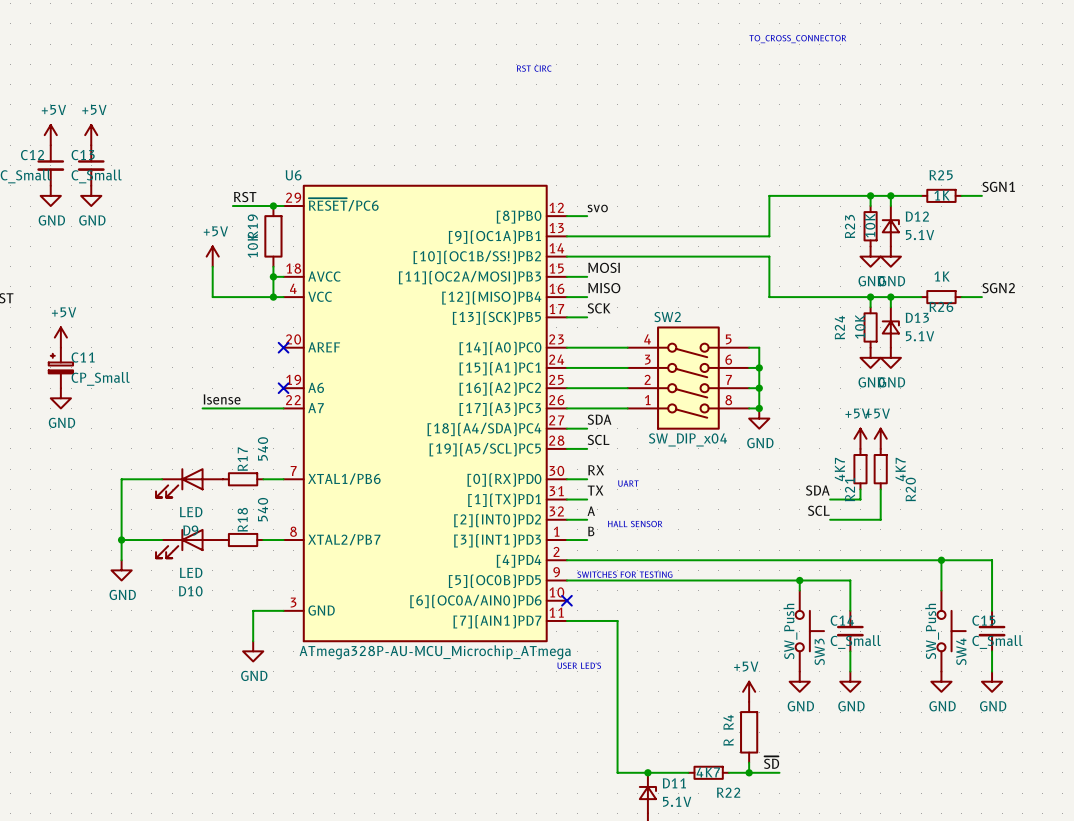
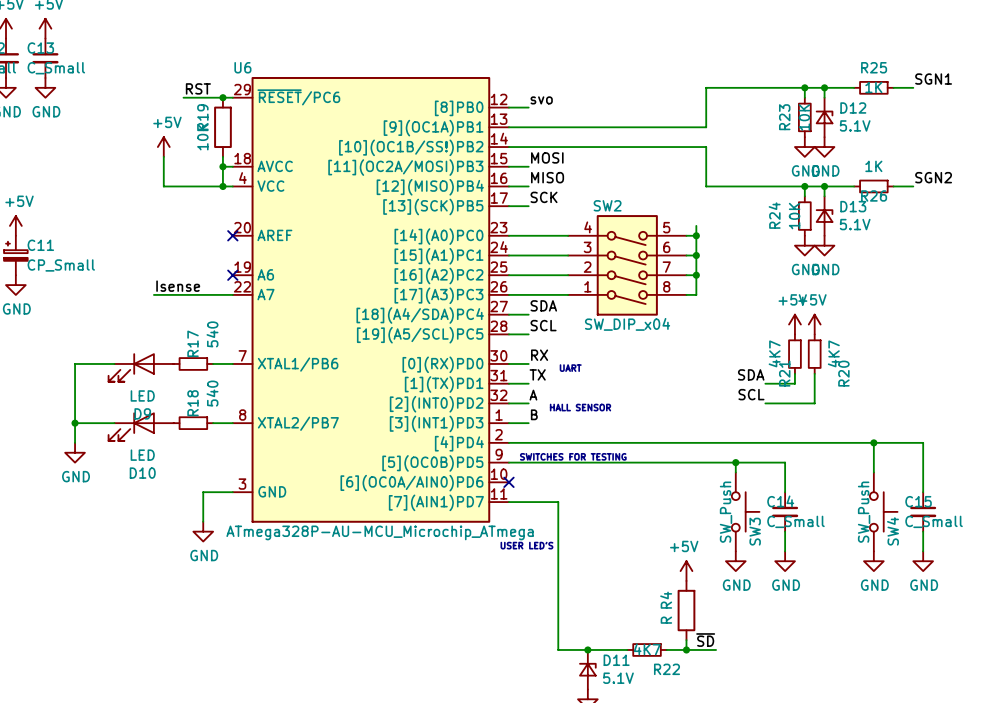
wire: none -> (696, 225) (696, 235)
junction: none -> (696, 235)
junction: (759, 408) -> none
power symbol: GND (759, 418) -> none

